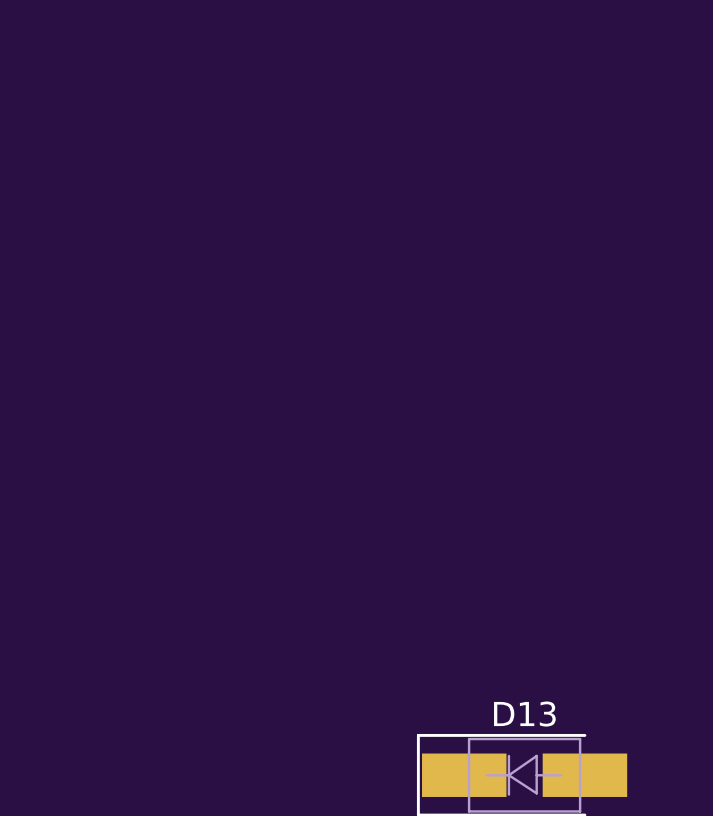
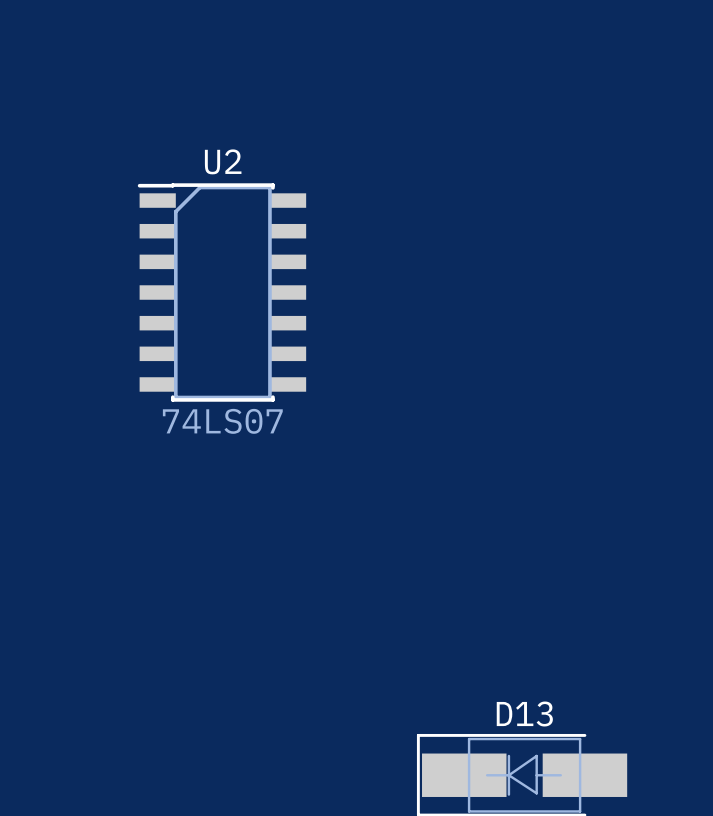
U2: none -> 74LS07 (221, 292)

